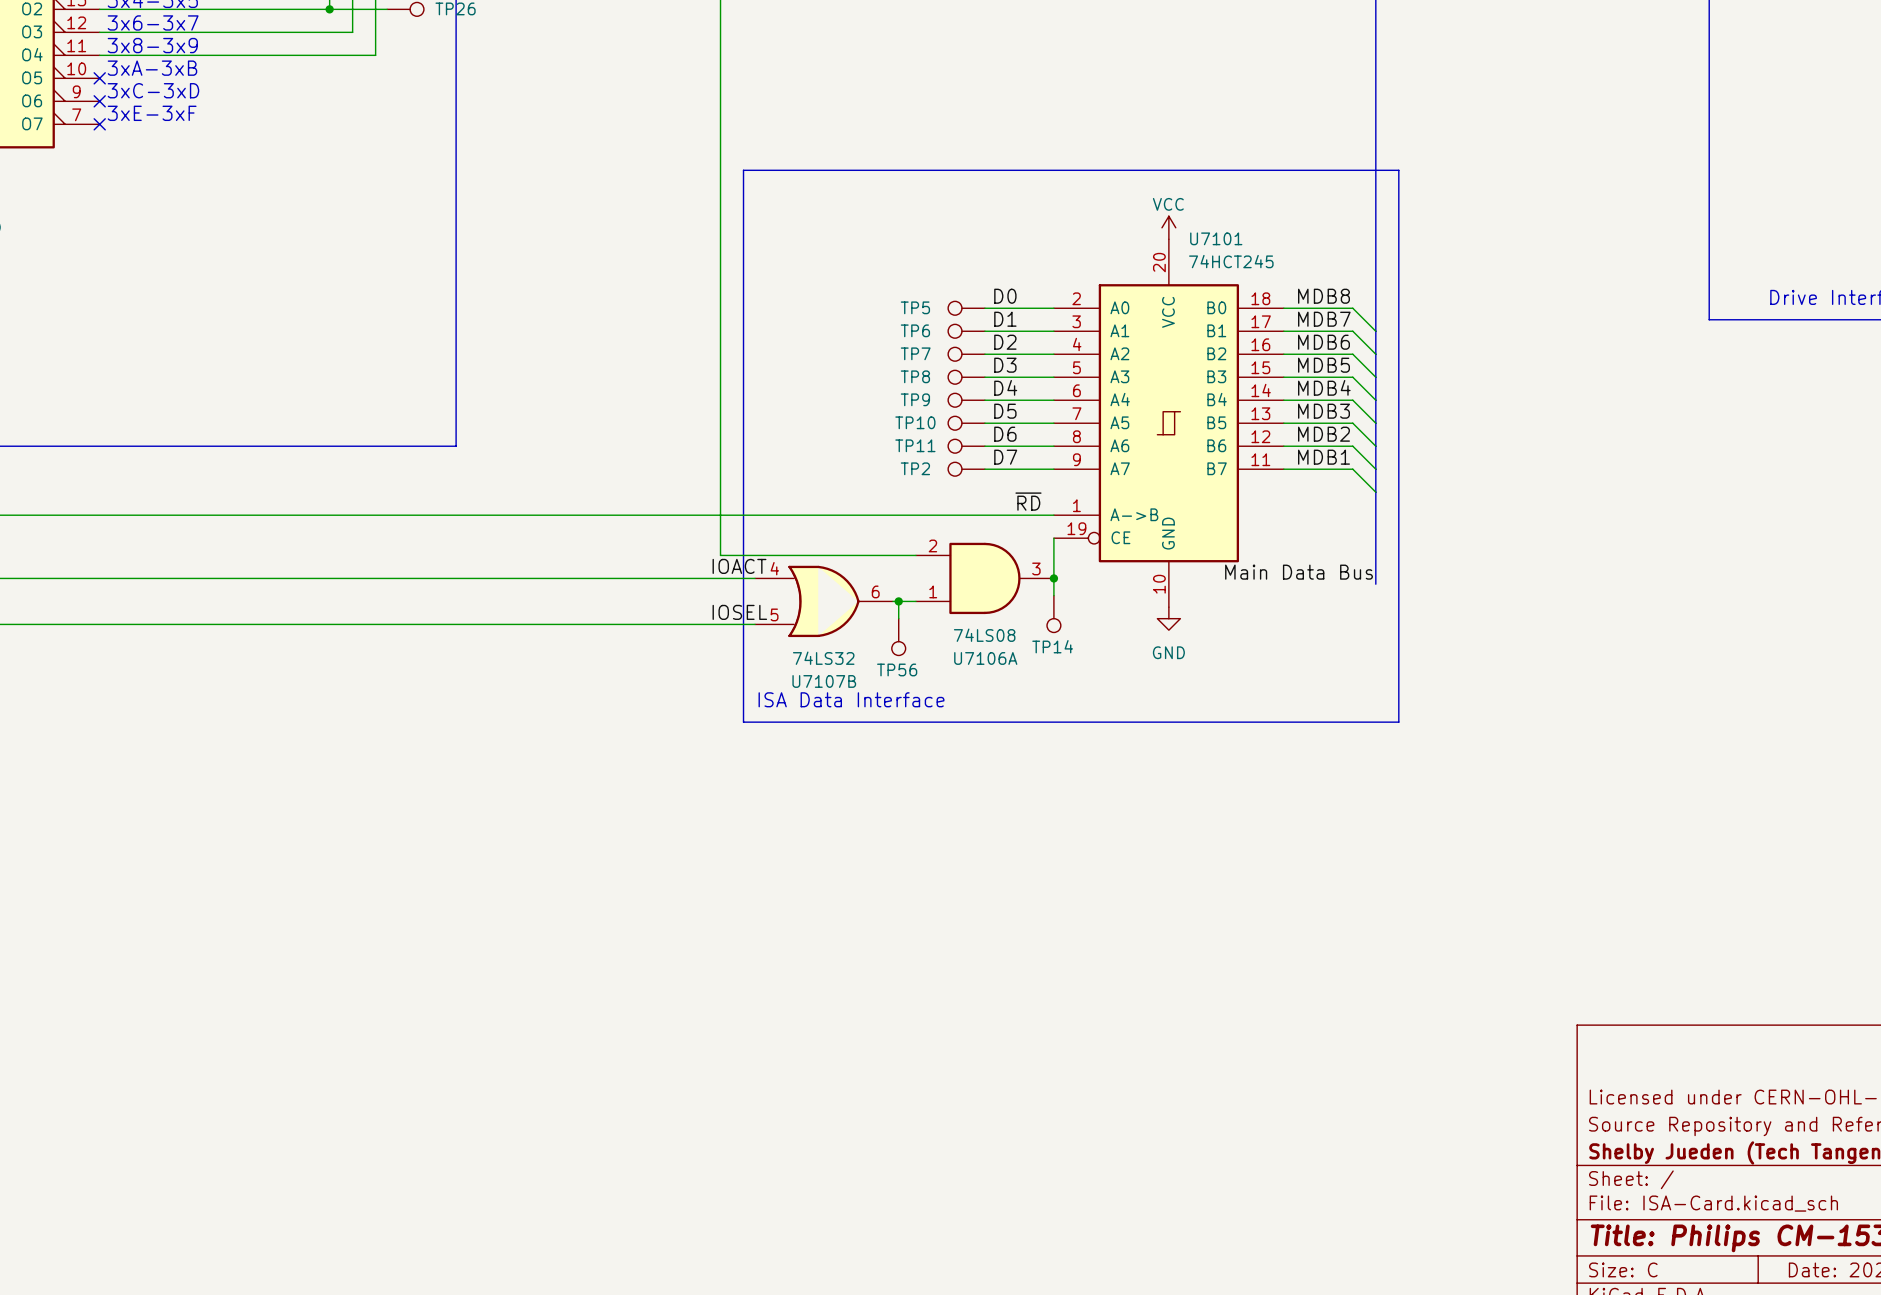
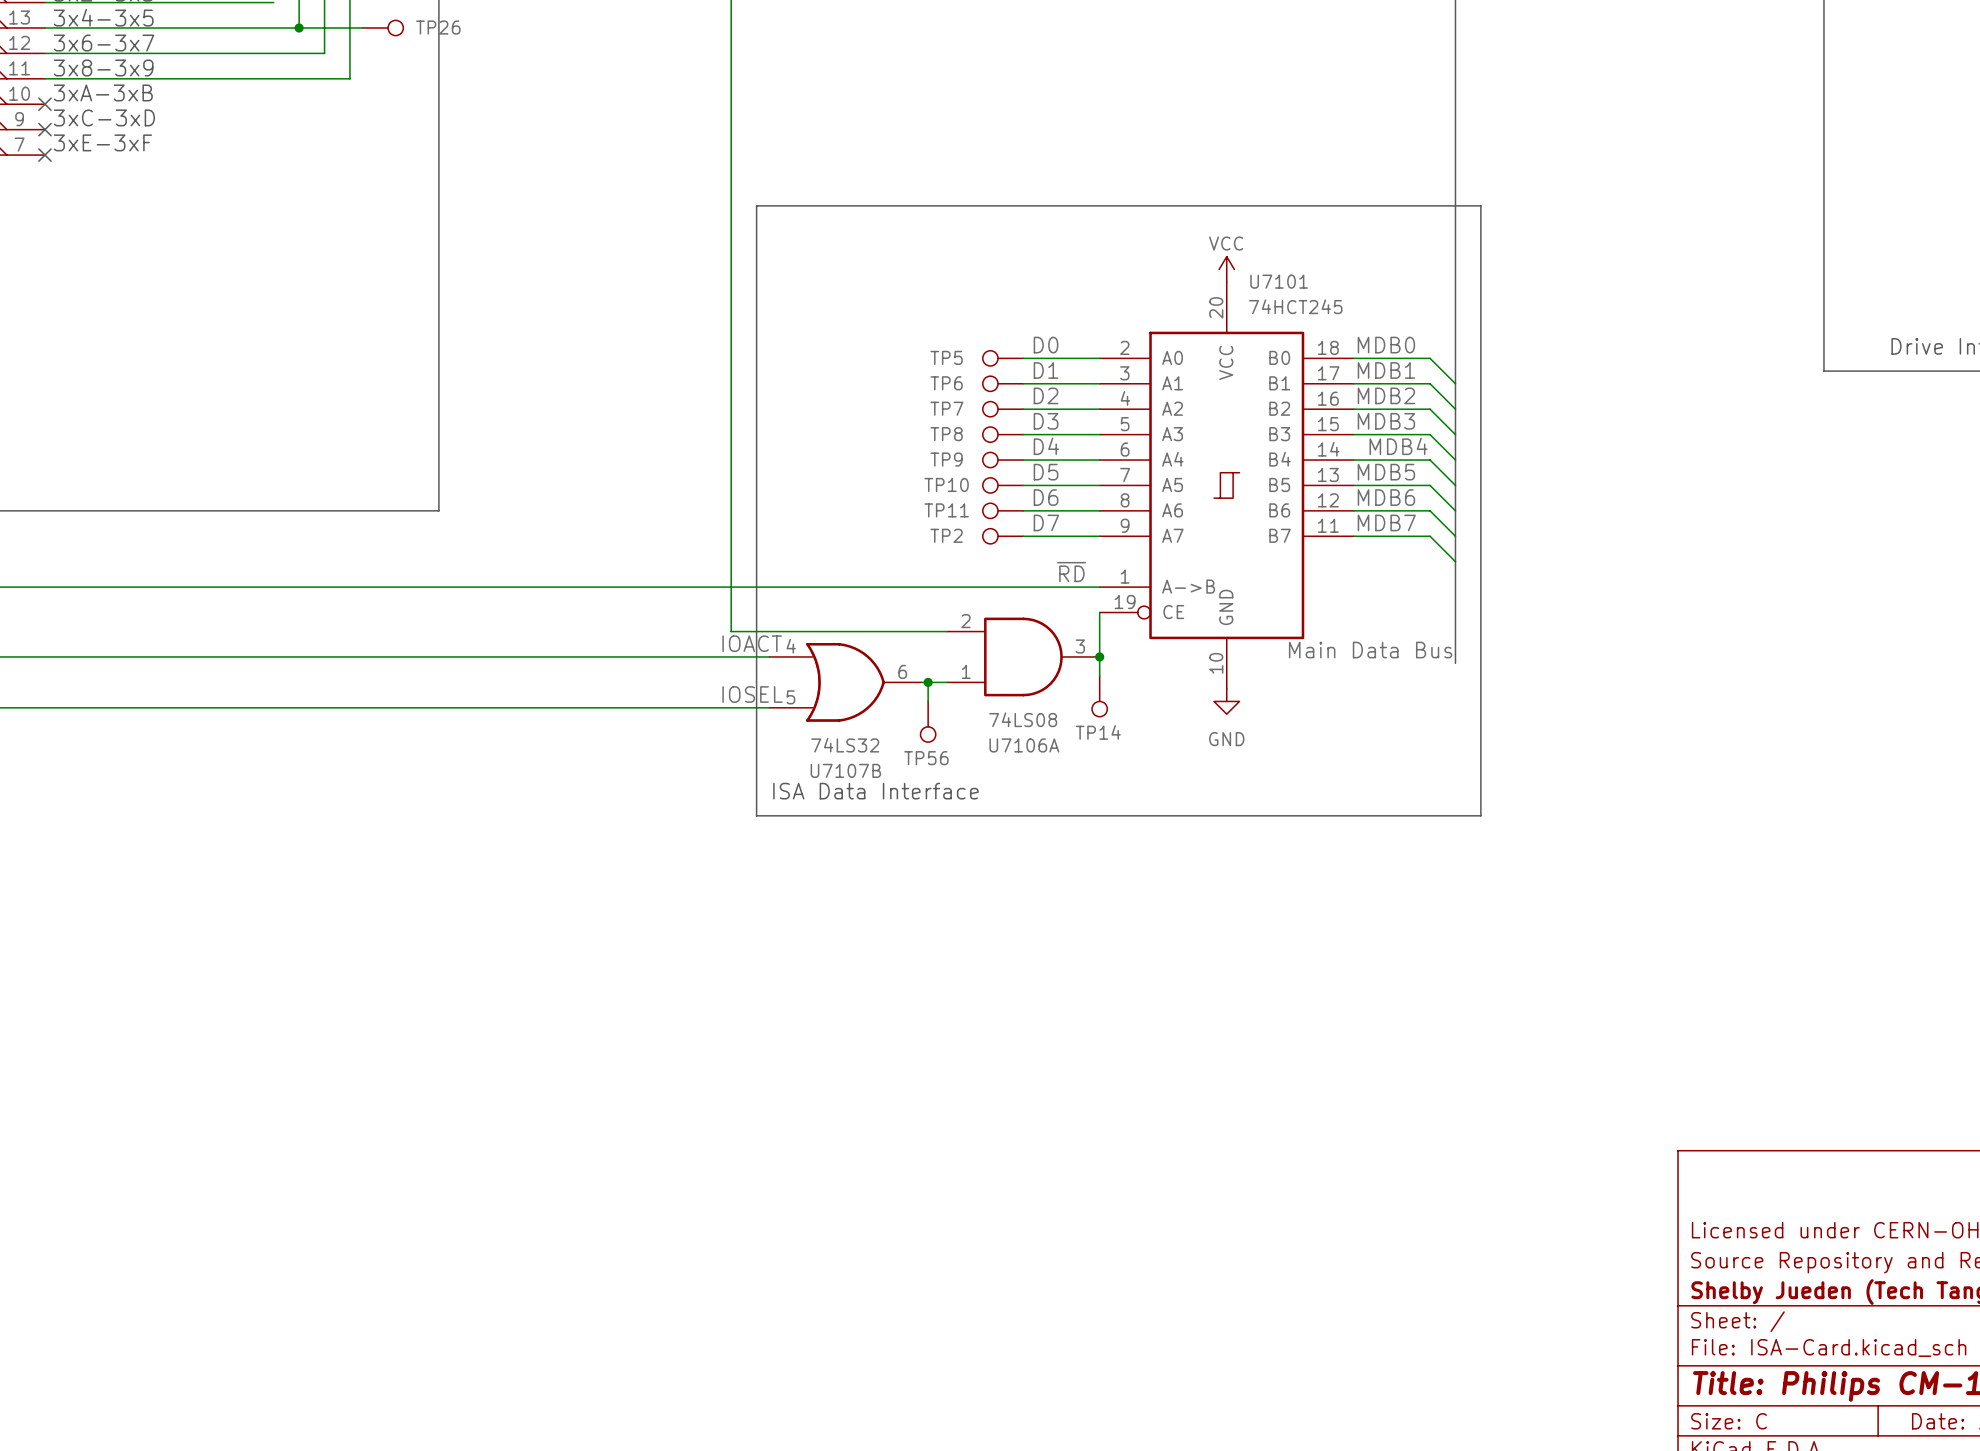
label: MDB8 (1324, 296) -> MDB0 (1386, 345)
label position: MDB7 (1324, 319) -> MDB7 (1386, 522)
label position: MDB6 (1324, 342) -> MDB6 (1386, 497)
label position: MDB5 (1324, 365) -> MDB5 (1386, 472)
label position: MDB3 (1324, 411) -> MDB3 (1386, 421)
label position: MDB2 (1324, 434) -> MDB2 (1386, 395)
label position: MDB1 (1324, 457) -> MDB1 (1386, 370)

